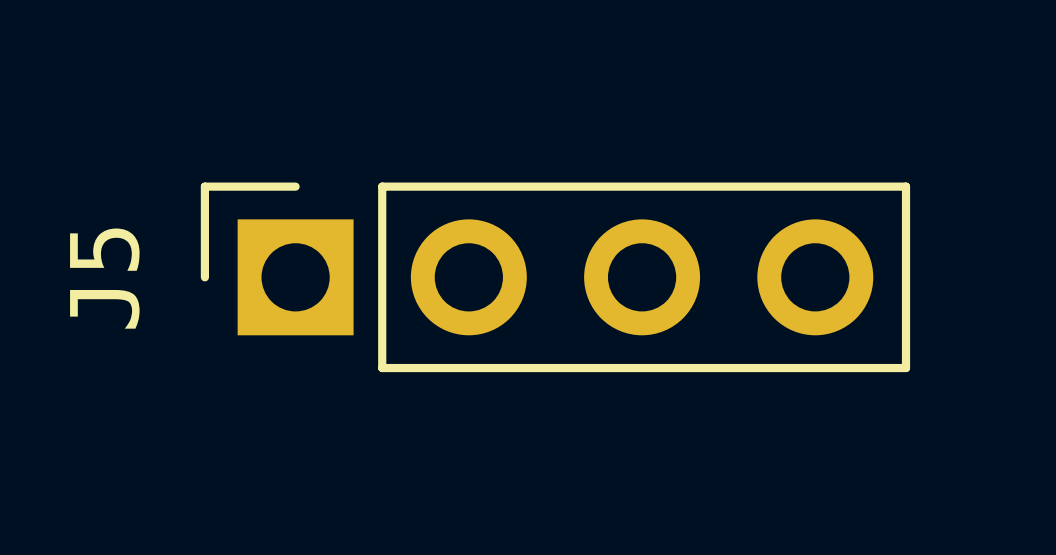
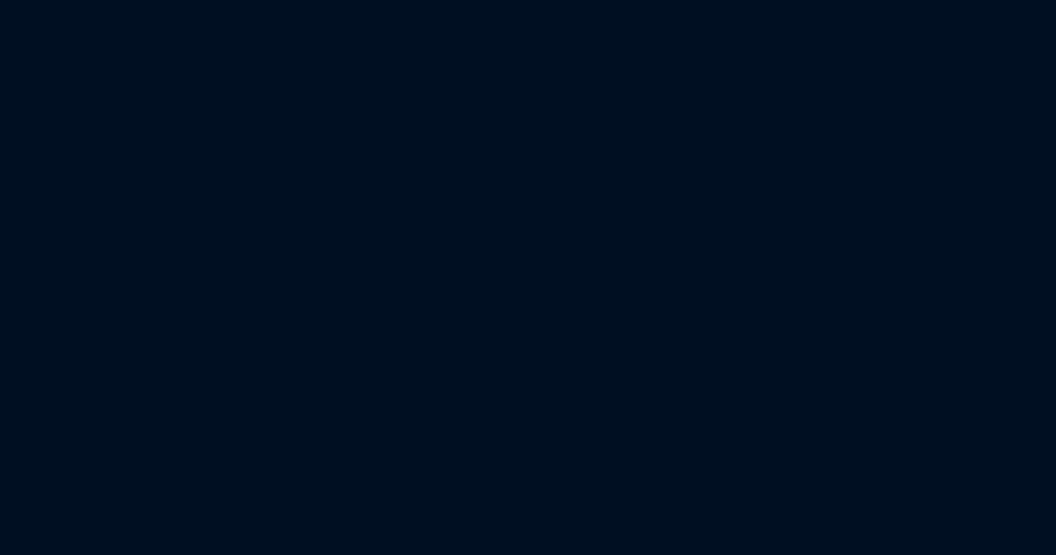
J5: (555, 277) -> none

